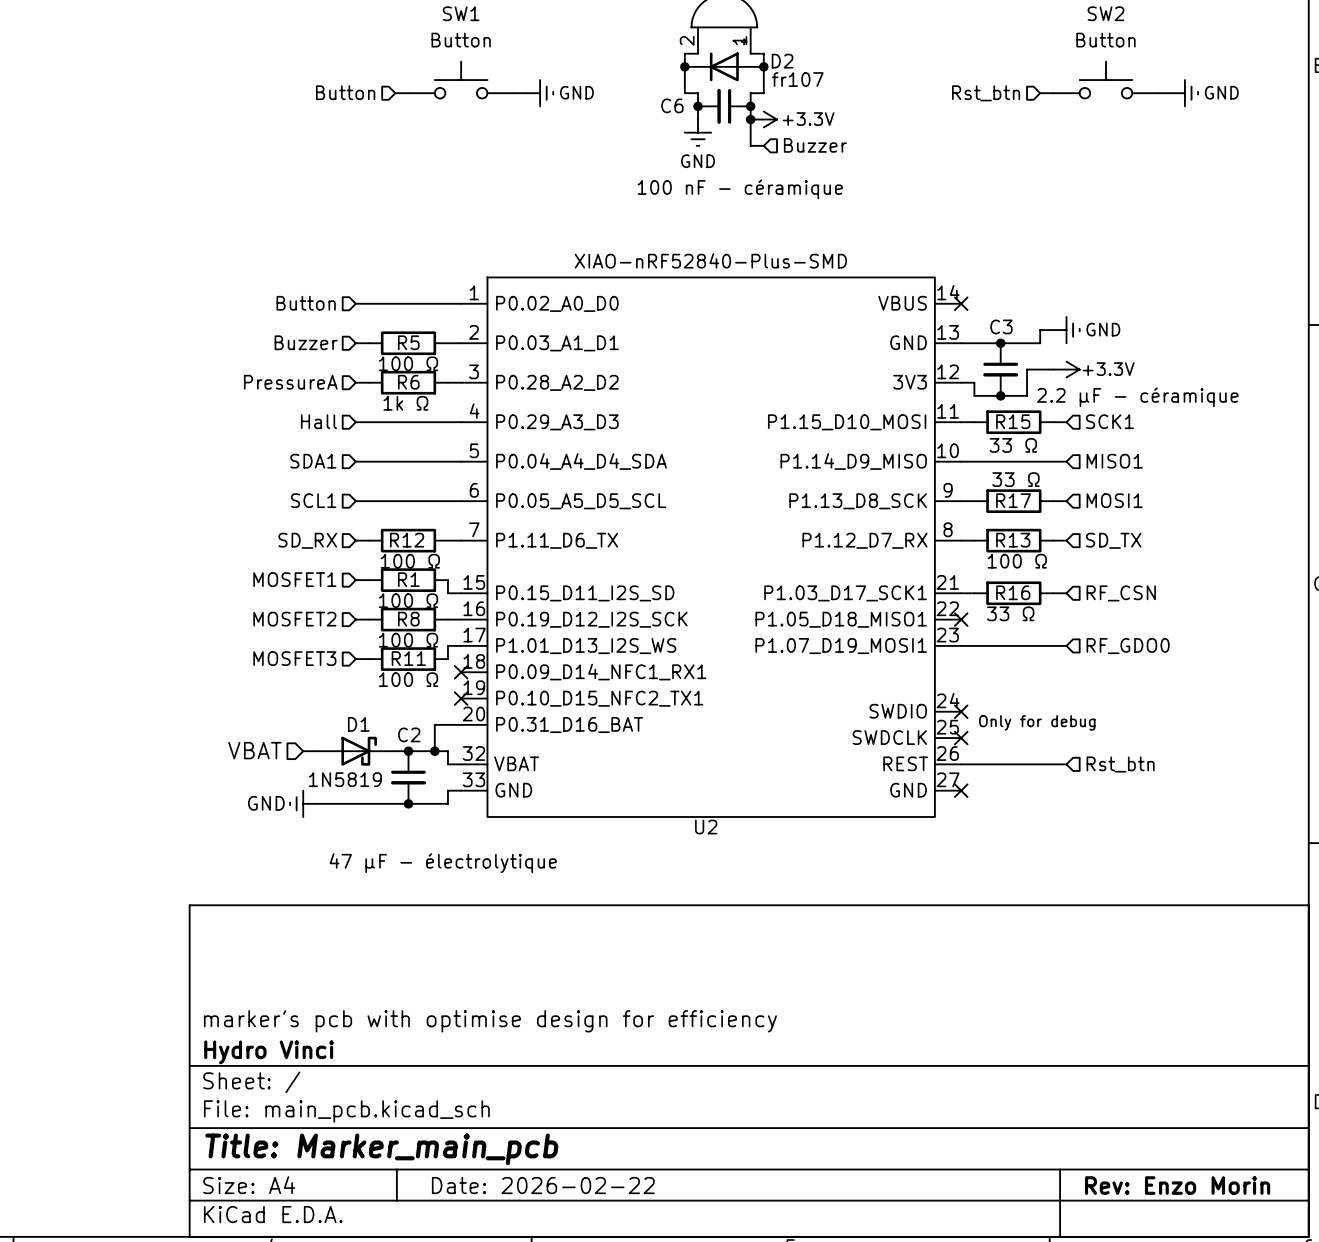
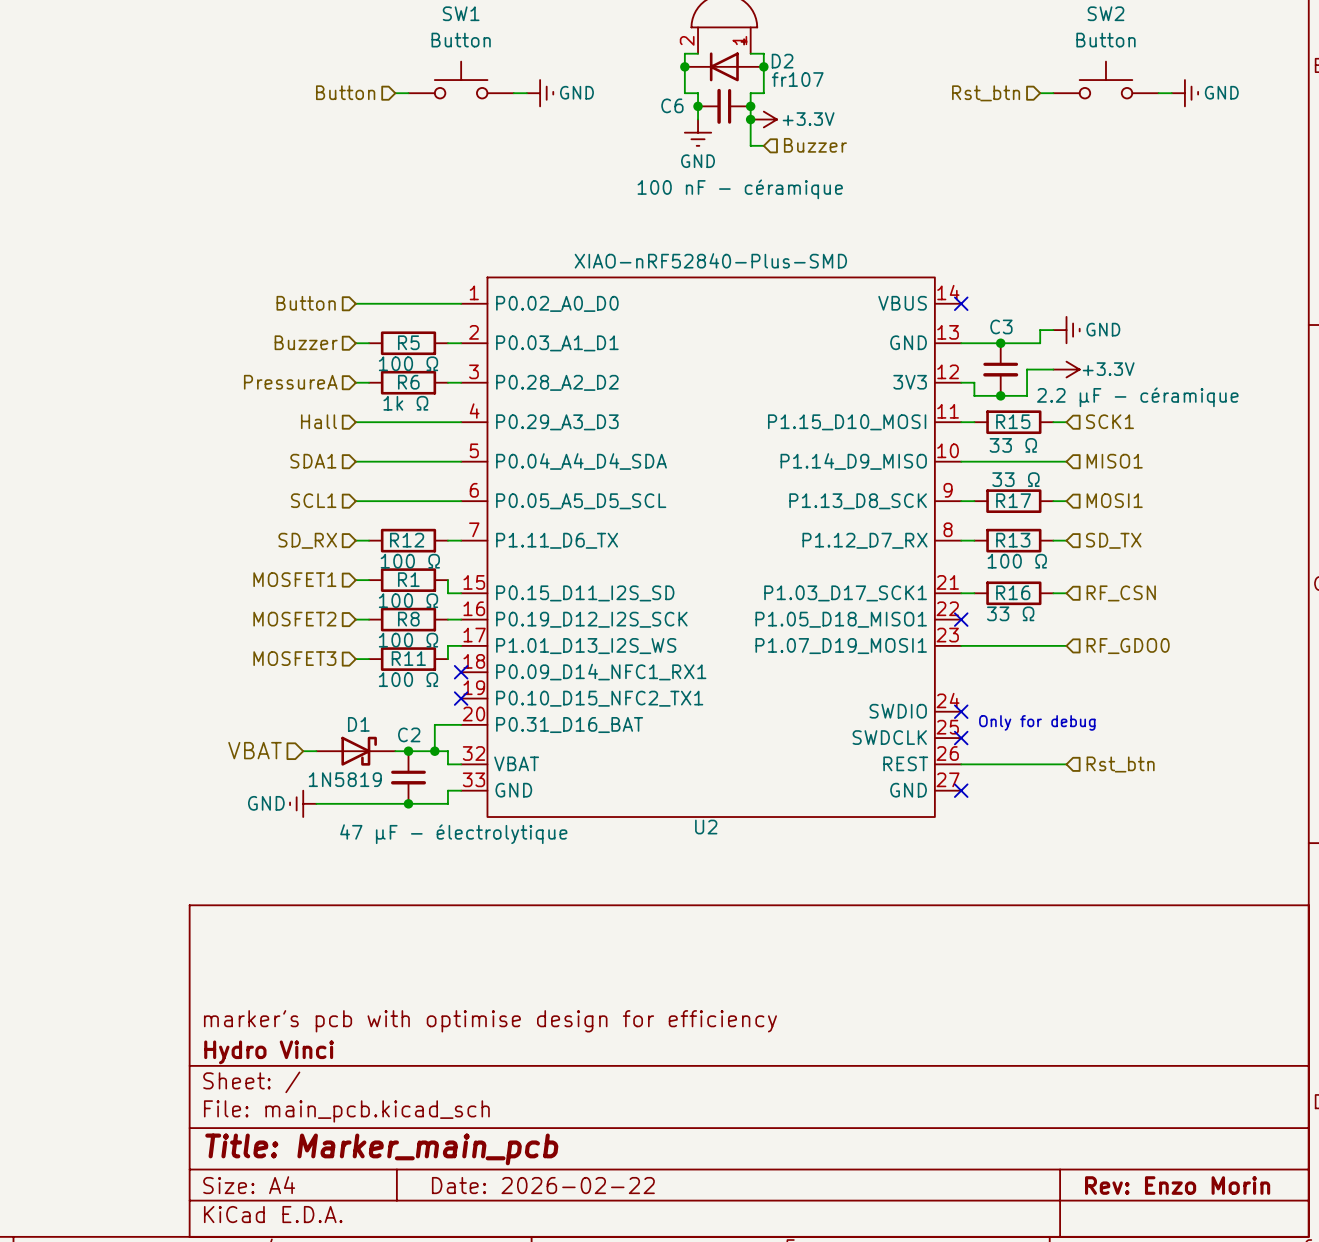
C2 value position: 47 µF - électrolytique (443, 863) -> 47 µF - électrolytique (453, 834)

